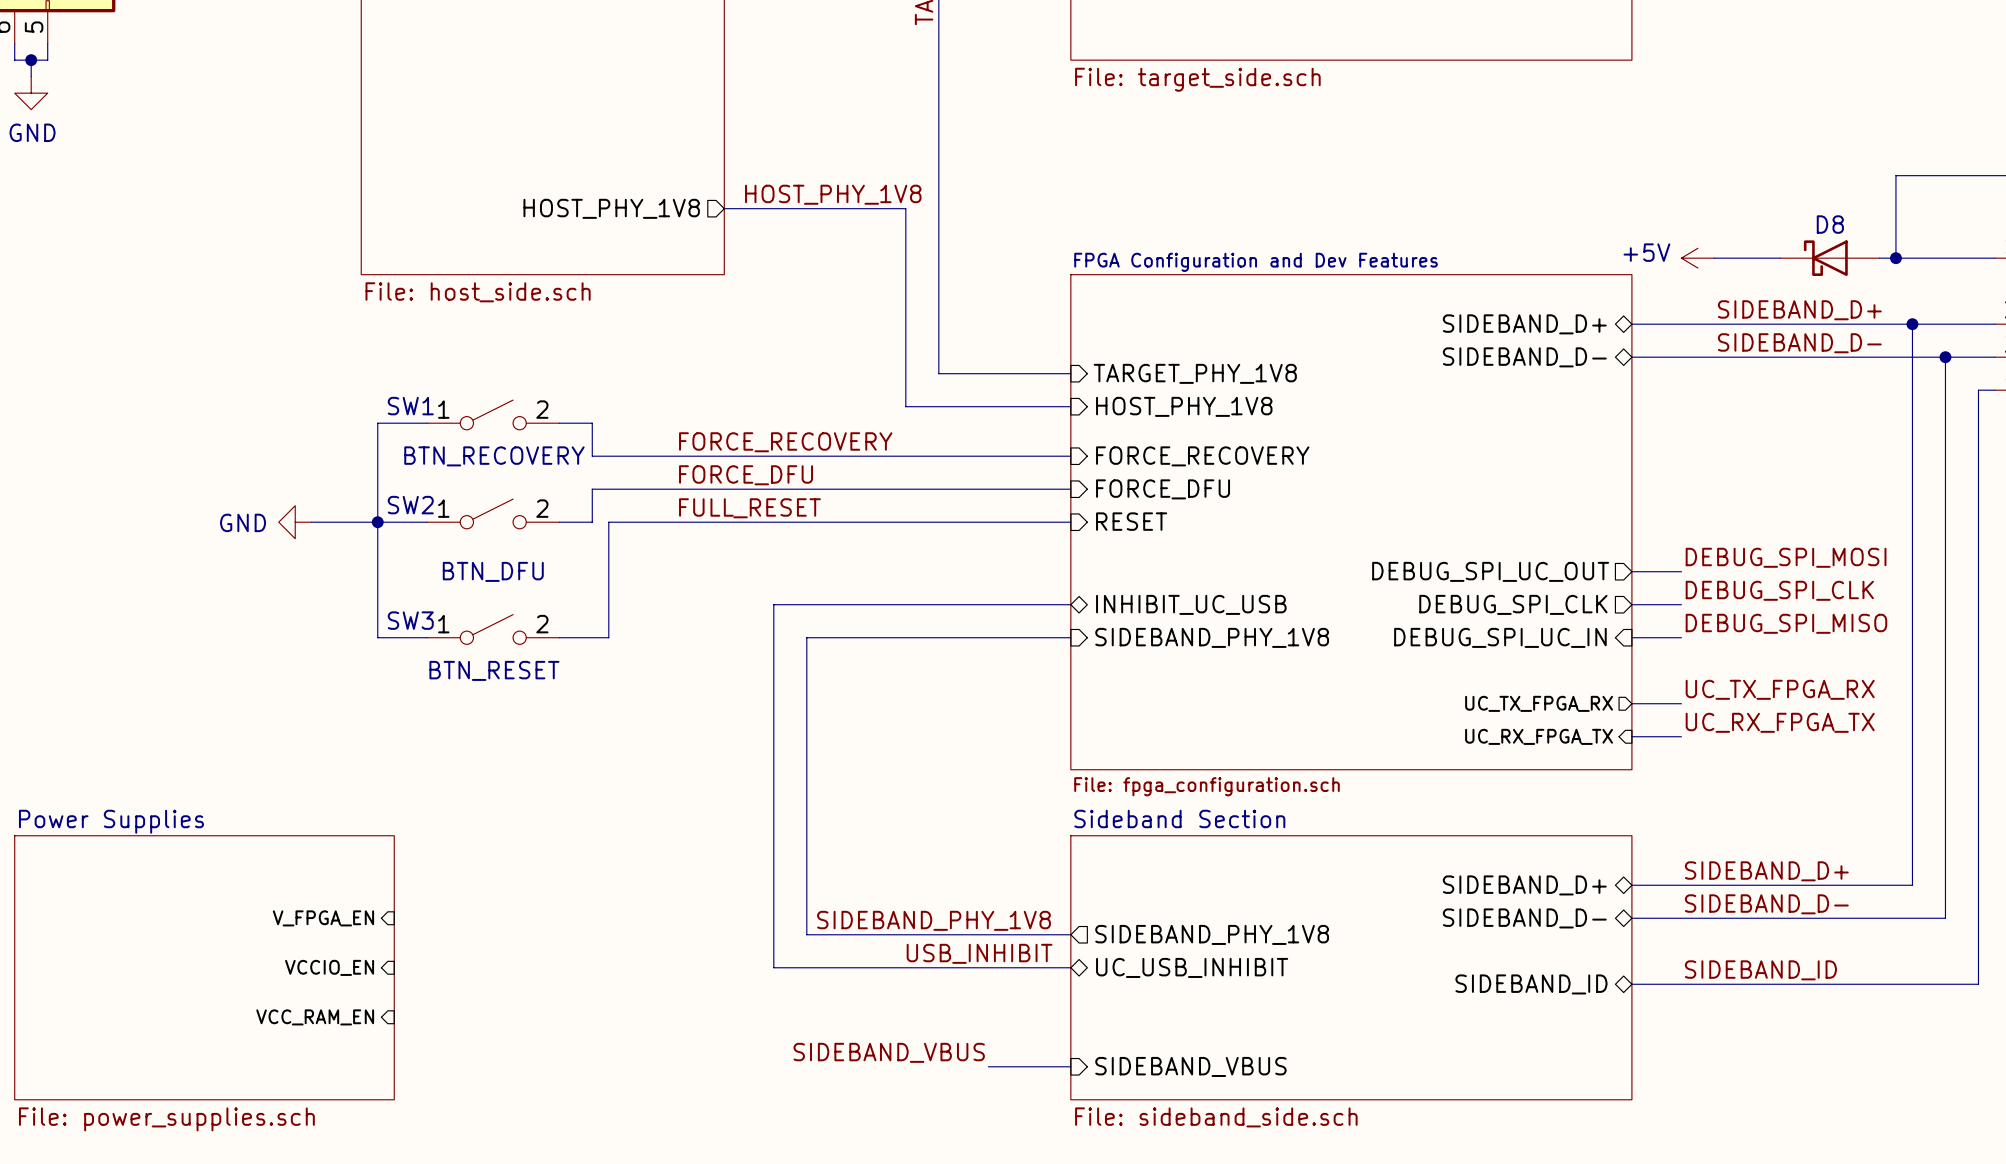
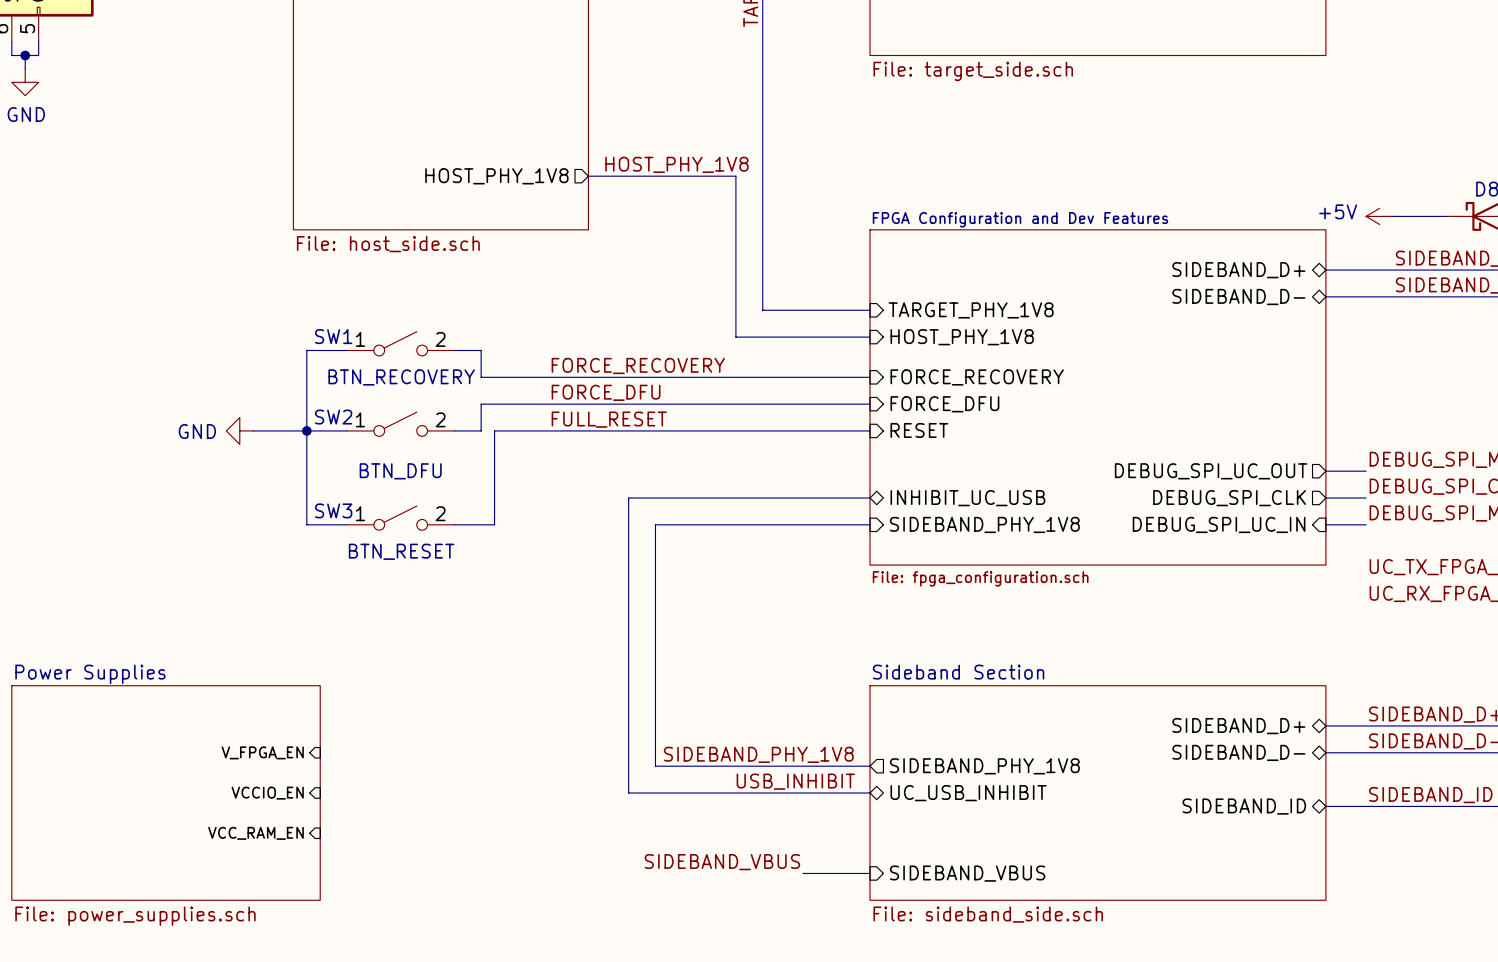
sheet FPGA Configuration and Dev Features: none -> File: fpga_configuration.sch (1097, 397)
sheet FPGA Configuration and Dev Features: File: fpga_configuration.sch (1351, 522) -> none
sheet pin: UC_TX_FPGA_RX (1539, 703) -> none
wire: (1631, 703) (1681, 703) -> none
sheet pin: UC_RX_FPGA_TX (1539, 736) -> none
wire: (1631, 736) (1681, 736) -> none

